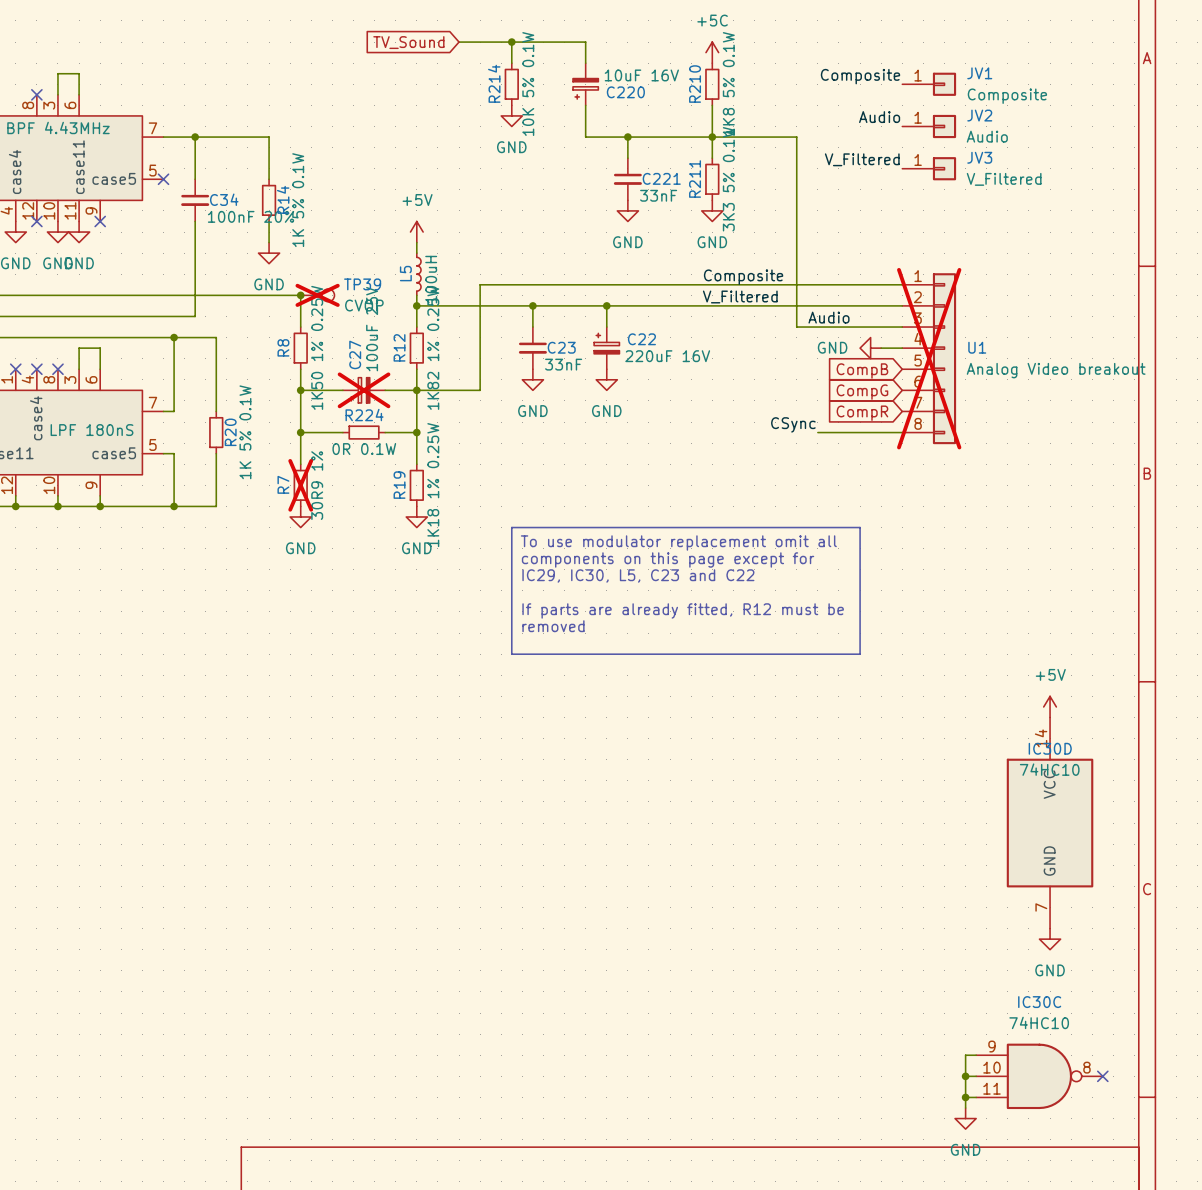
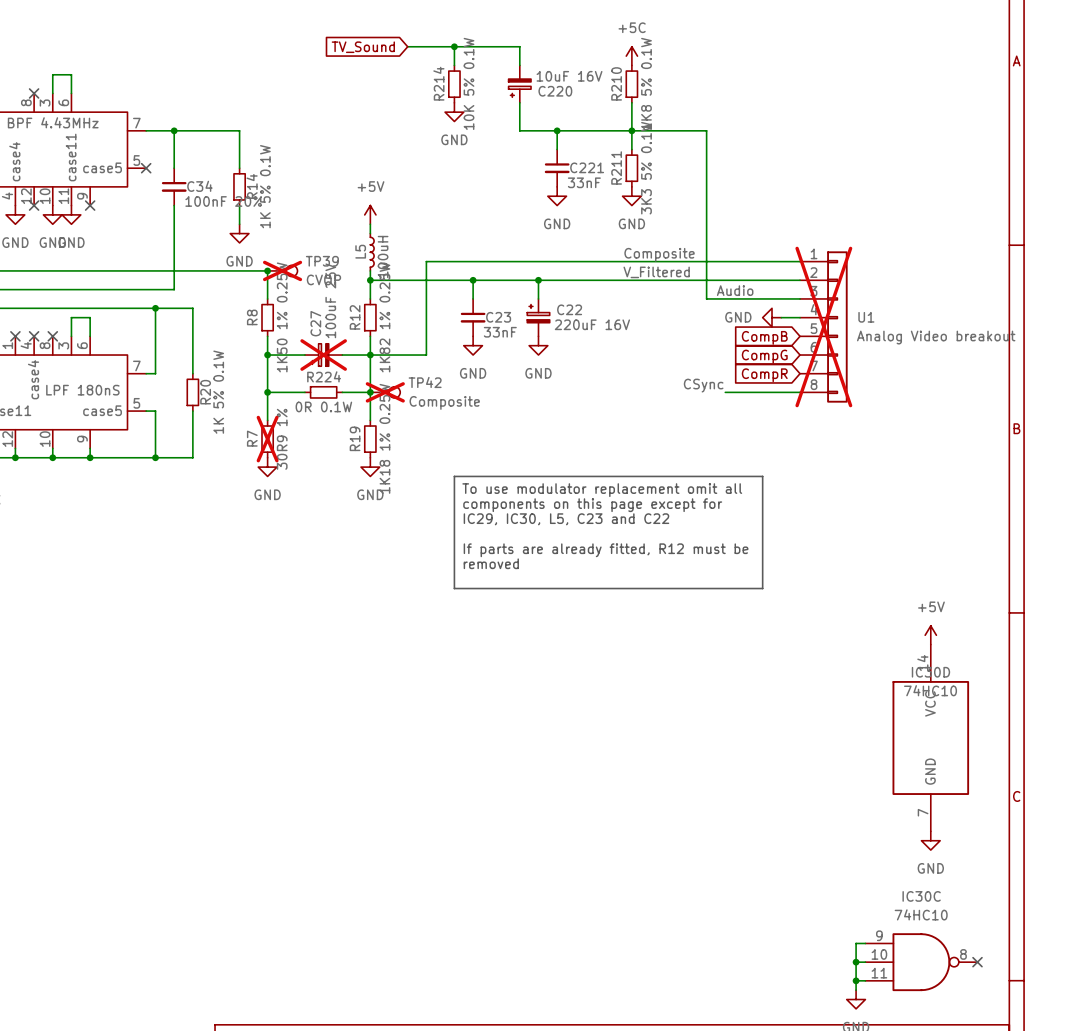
label: Composite (860, 76) -> none
JV1: Composite (929, 84) -> none
label: Audio (879, 117) -> none
JV2: Audio (929, 126) -> none
label: V_Filtered (862, 159) -> none
JV3: V_Filtered (929, 168) -> none
TP42: none -> Composite (385, 392)

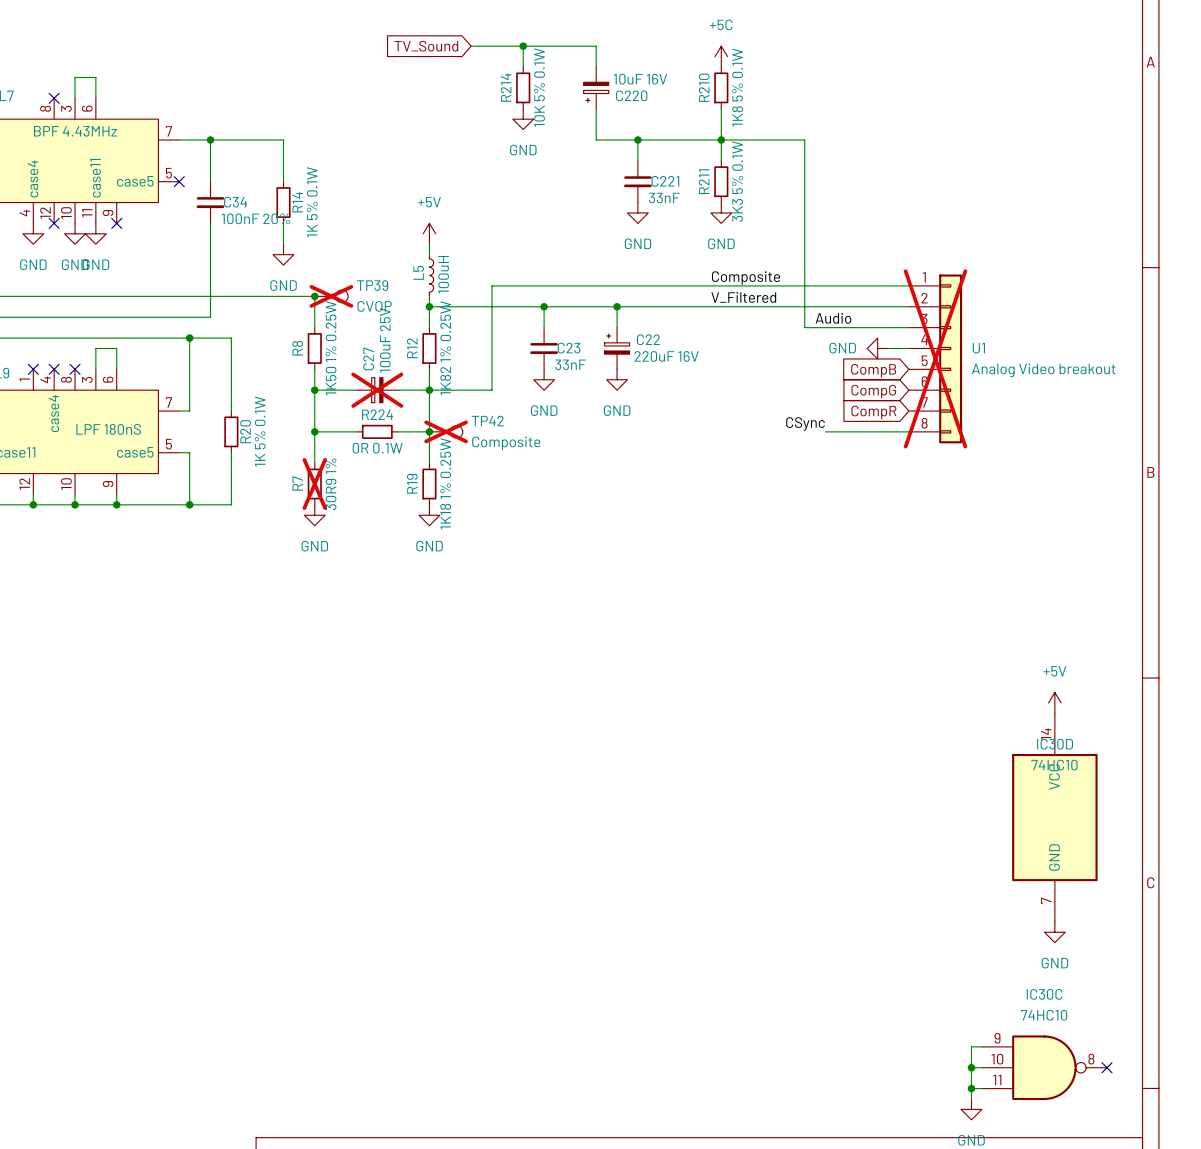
line: (454, 476) (762, 476) (762, 588) (454, 588) (454, 476) -> none
text: To use modulator replacement omit all (602, 490) -> none
text: components on this page except for (592, 505) -> none
text: IC29, IC30, L5, C23 and C22 (566, 519) -> none
text: If parts are already fitted, R12 must be (606, 550) -> none
text: removed (491, 563) -> none

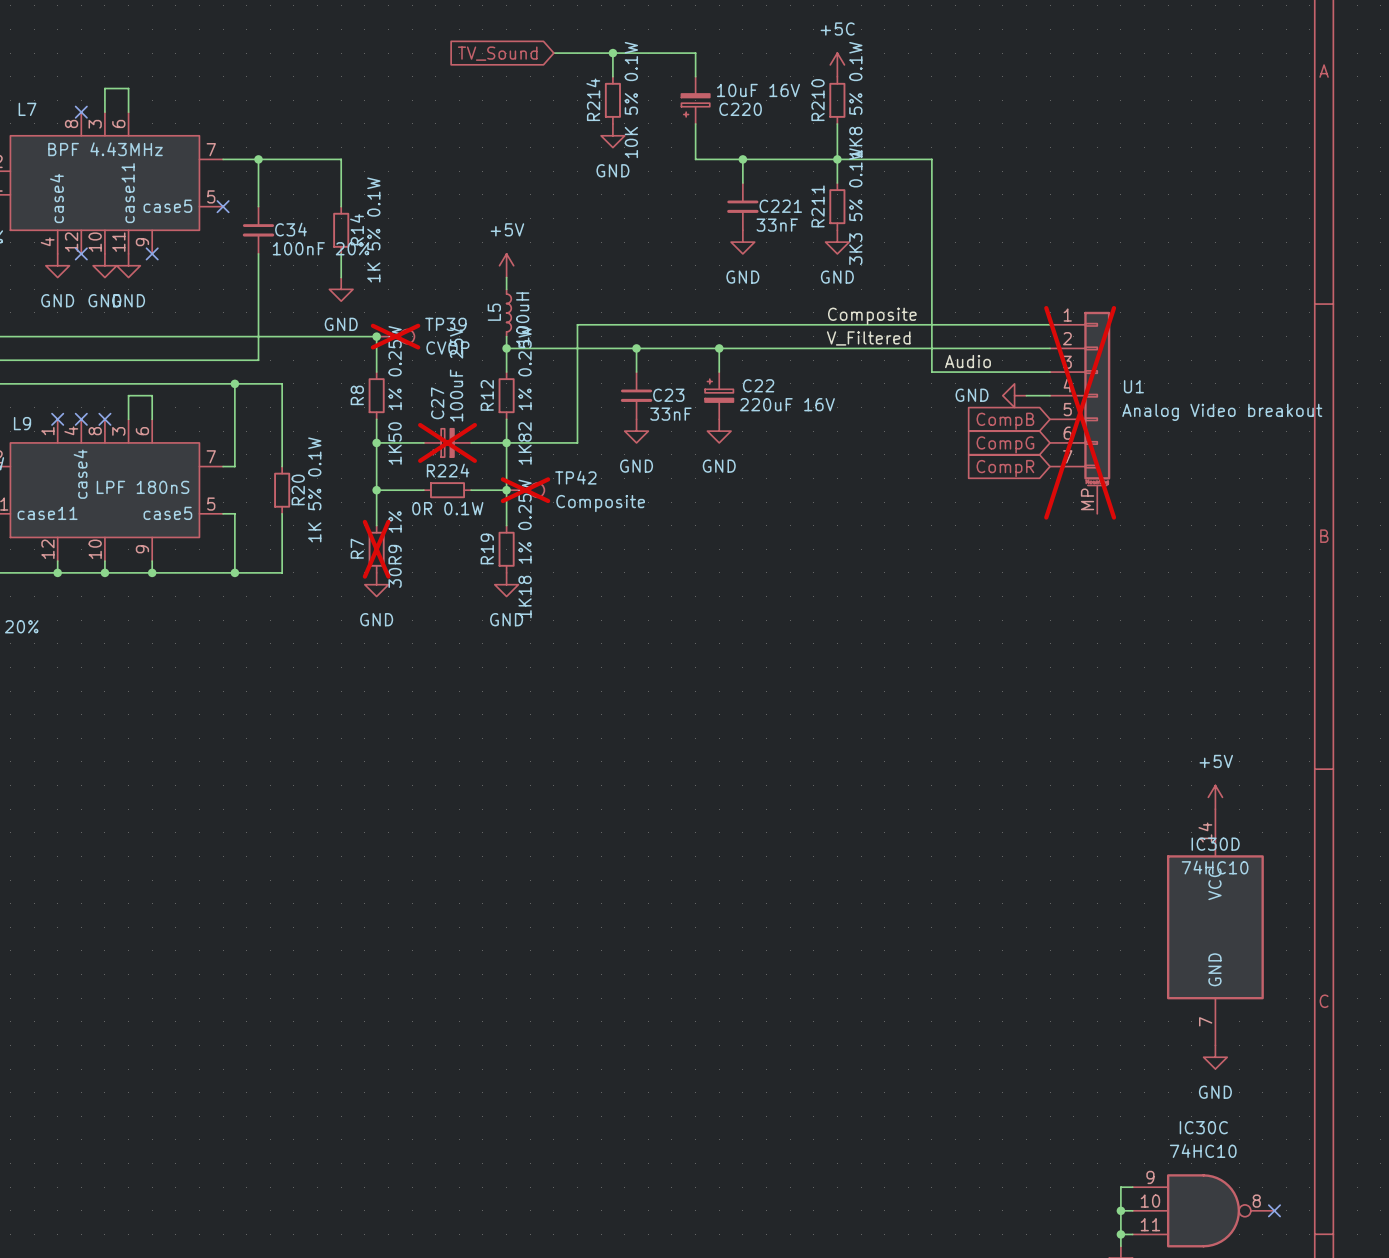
U1 symbol: [908, 274, 963, 444] -> [1050, 311, 1111, 514]
label: CSync (805, 424) -> none
wire: (825, 431) (908, 431) -> none

